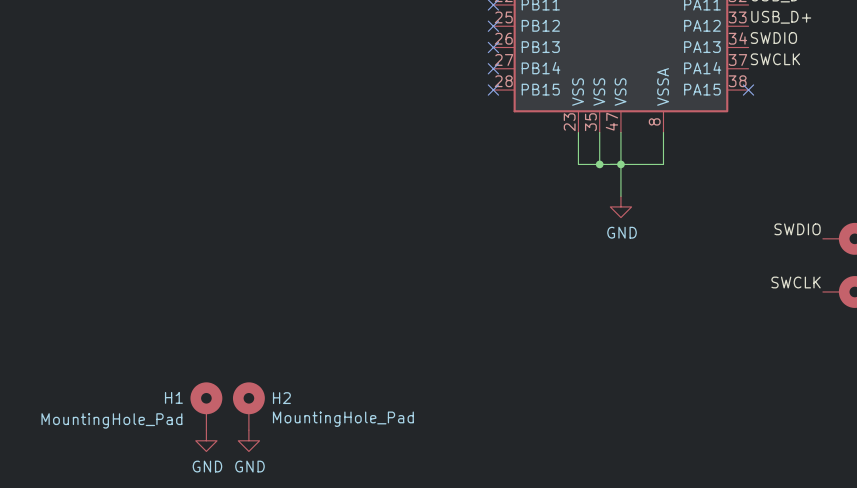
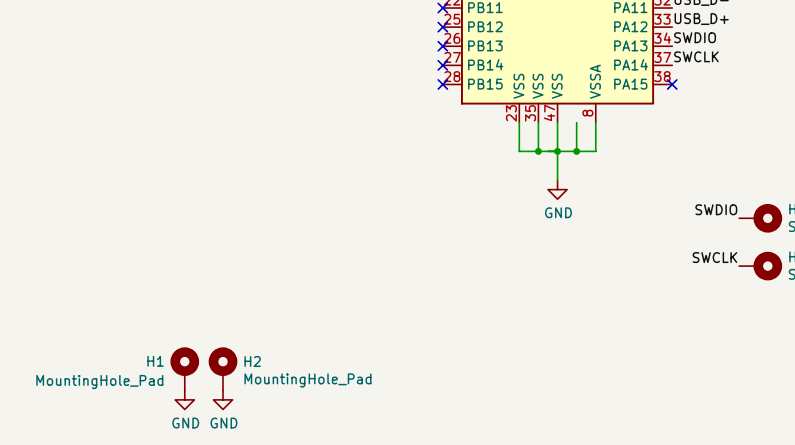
wire: none -> (576, 122) (576, 151)
junction: none -> (576, 151)

